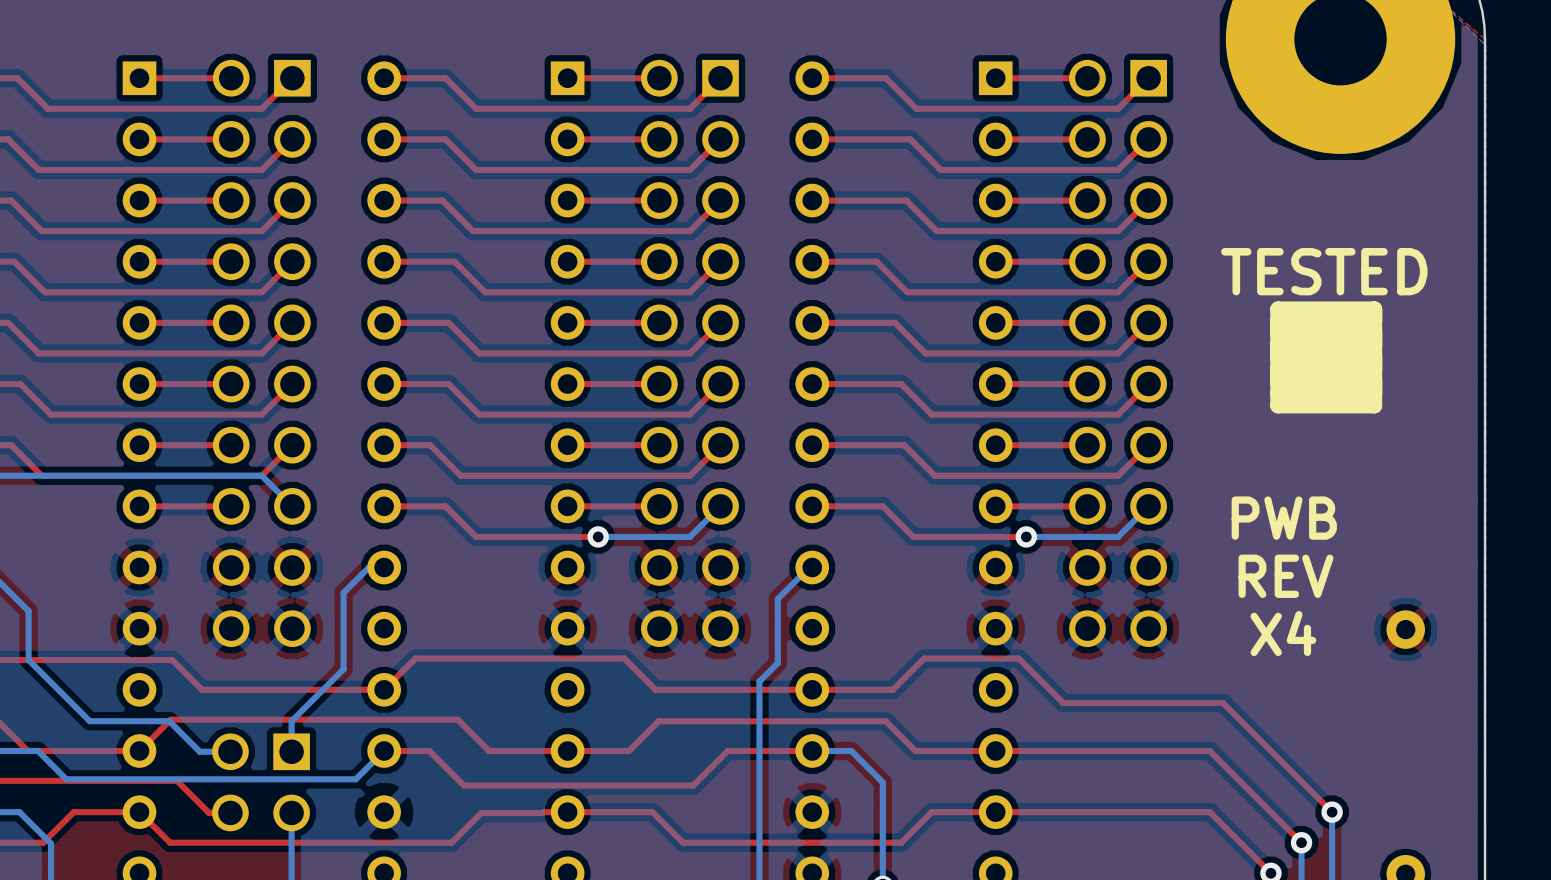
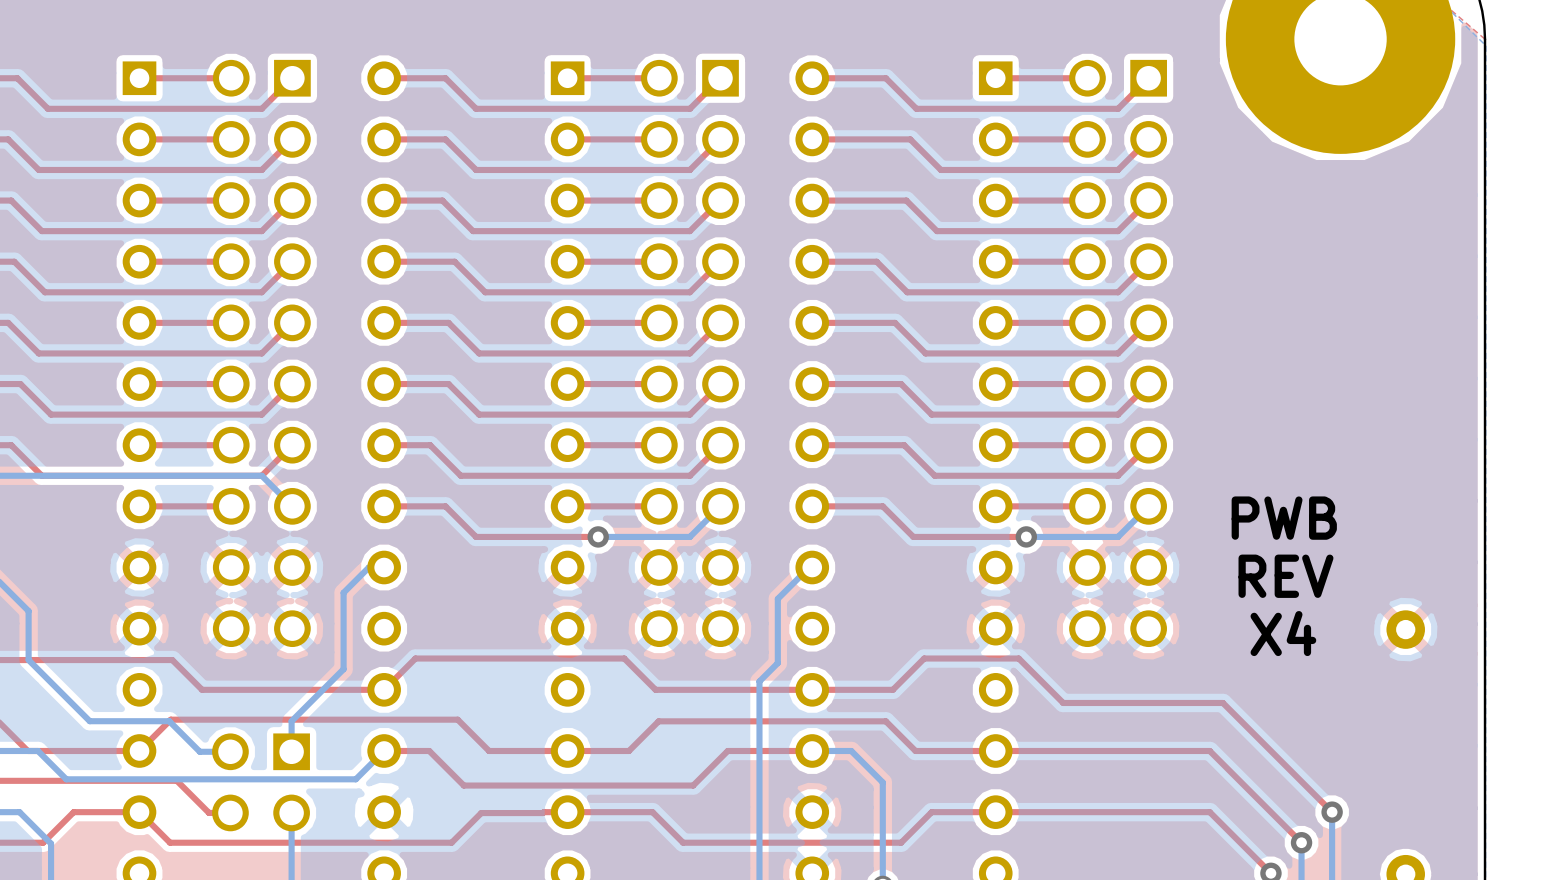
TESTED: (1326, 357) -> none

